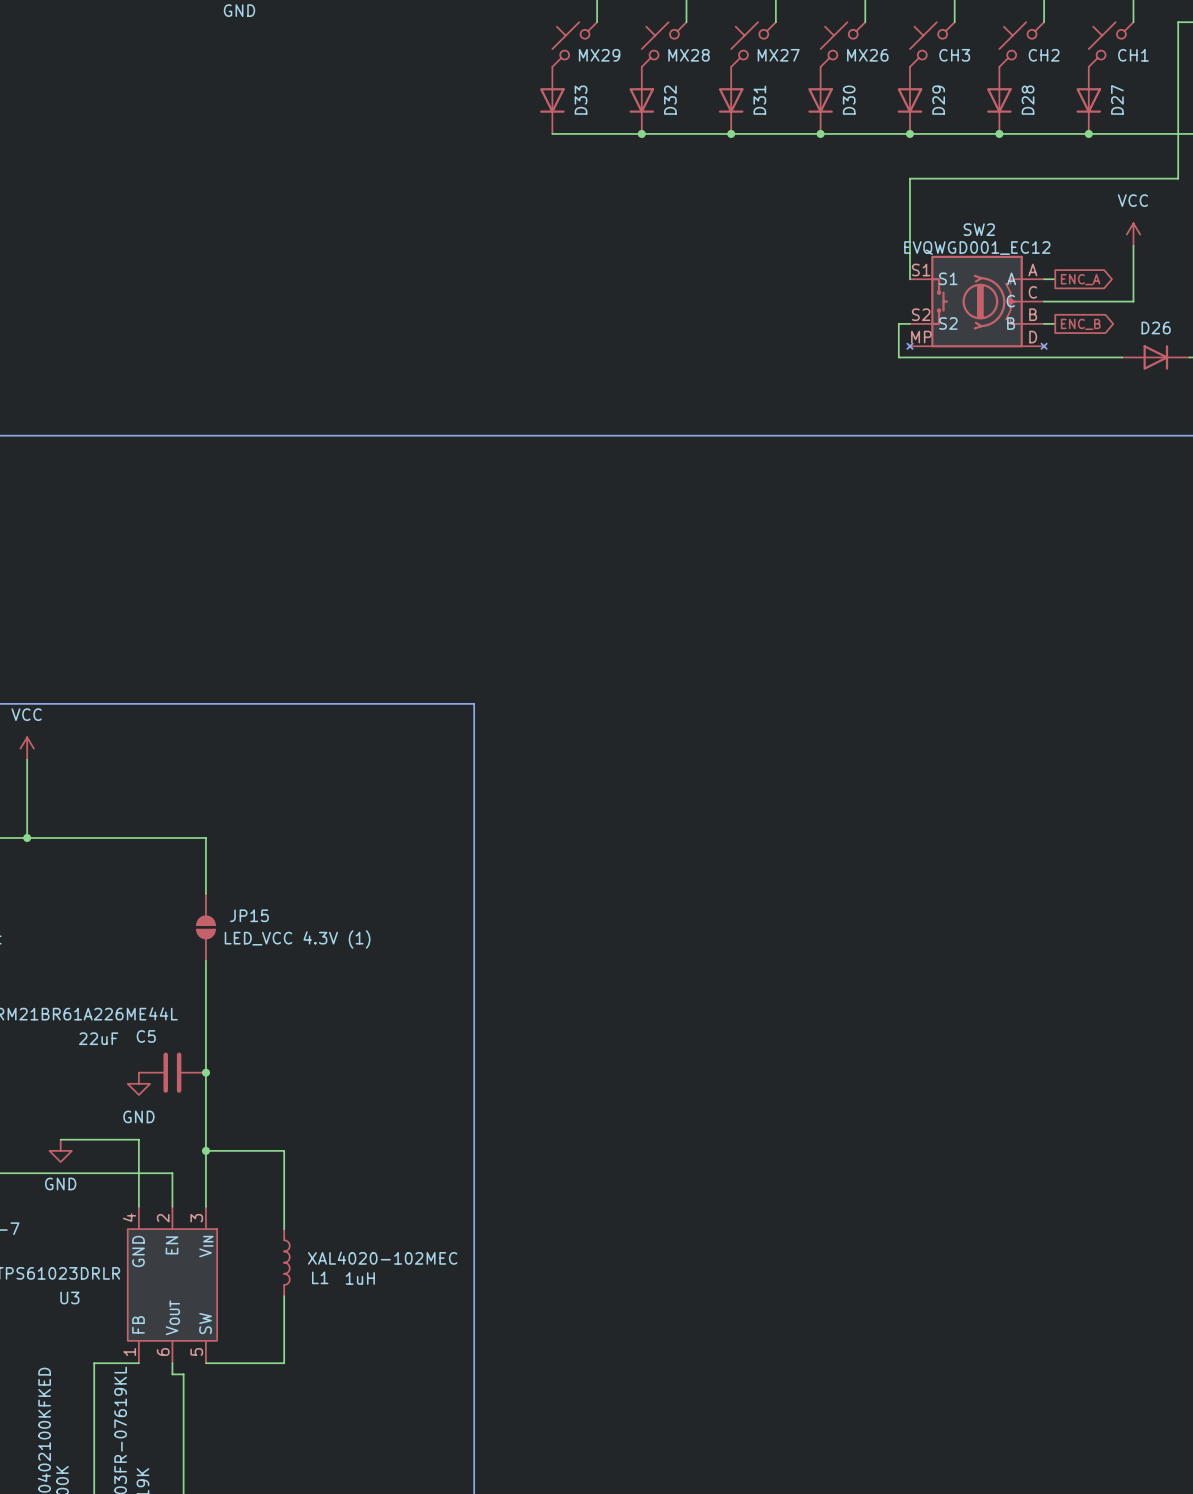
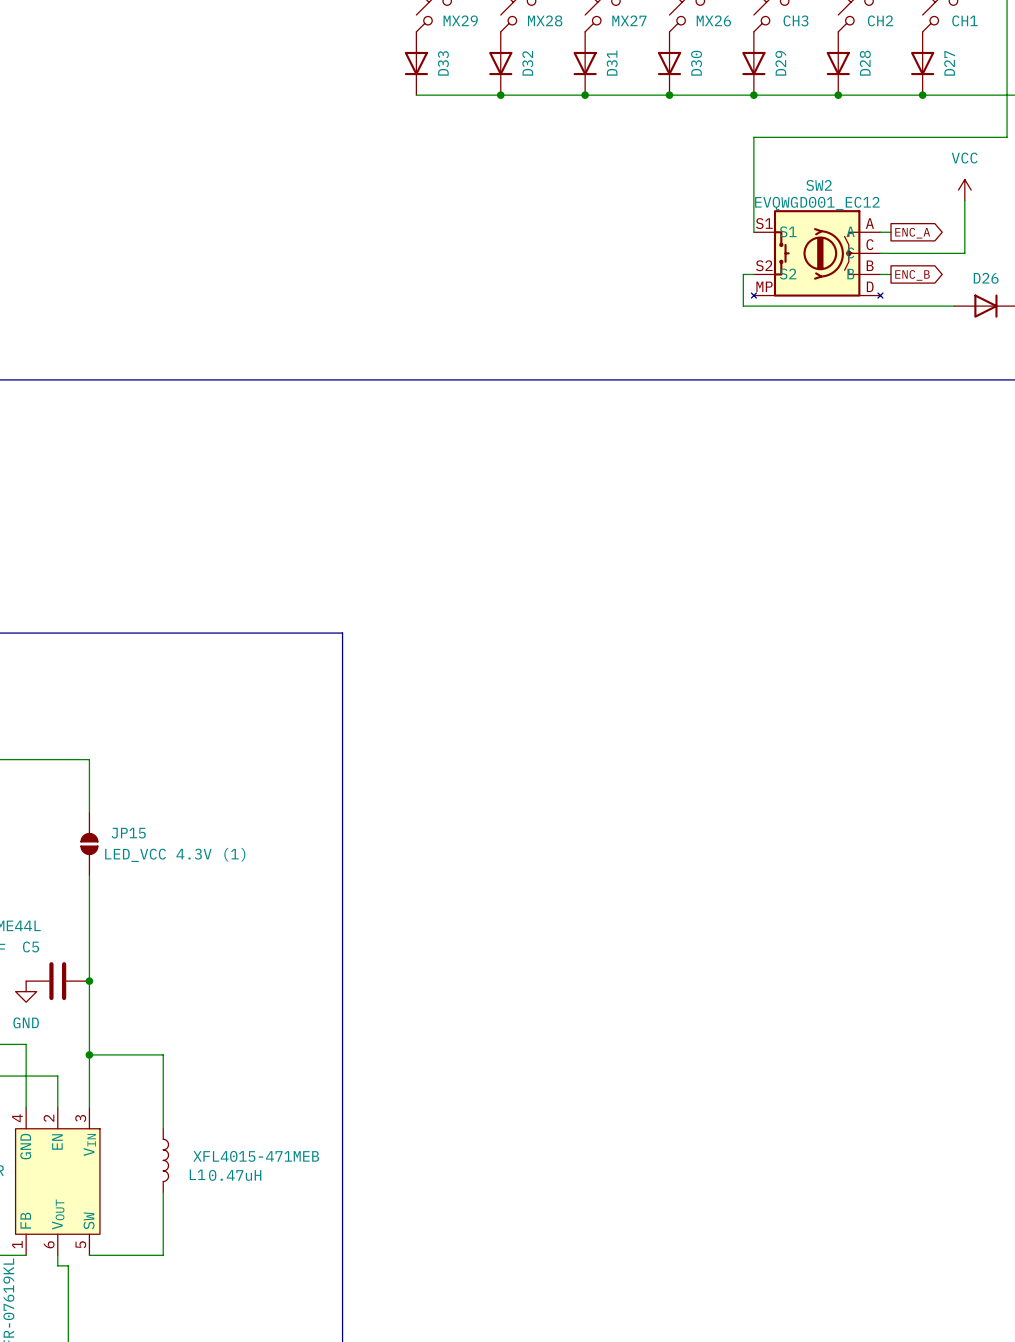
L1 value: XAL4020-102MEC (382, 1258) -> XFL4015-471MEB (256, 1156)
L1 text: 1uH (360, 1278) -> 0.47uH (235, 1175)

